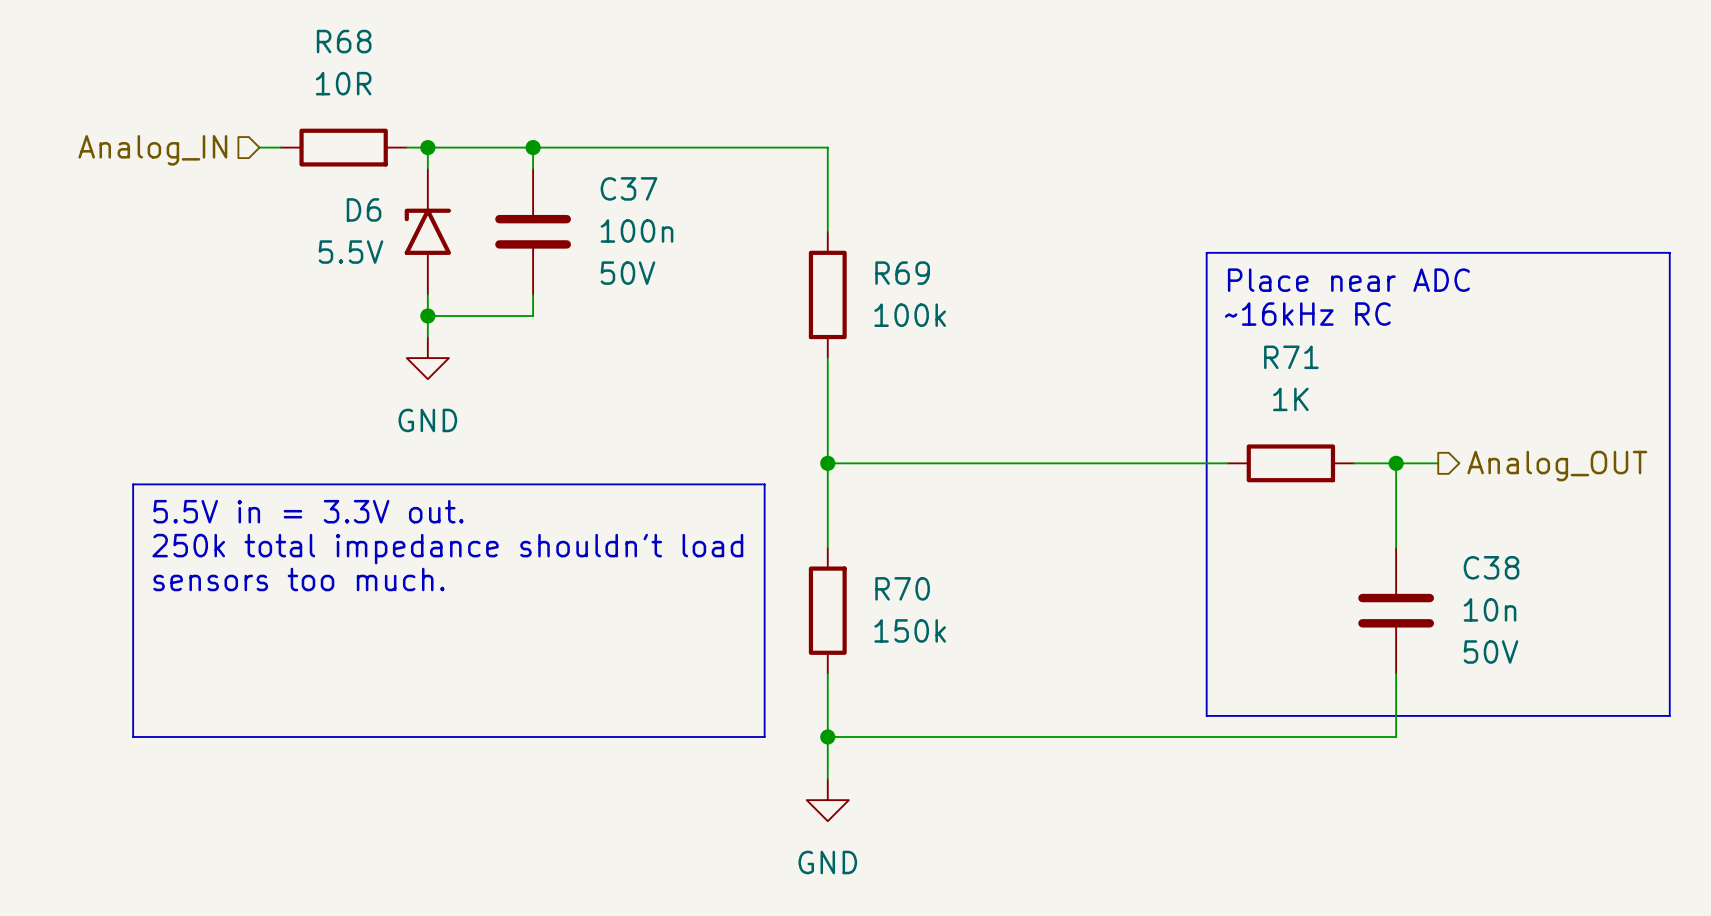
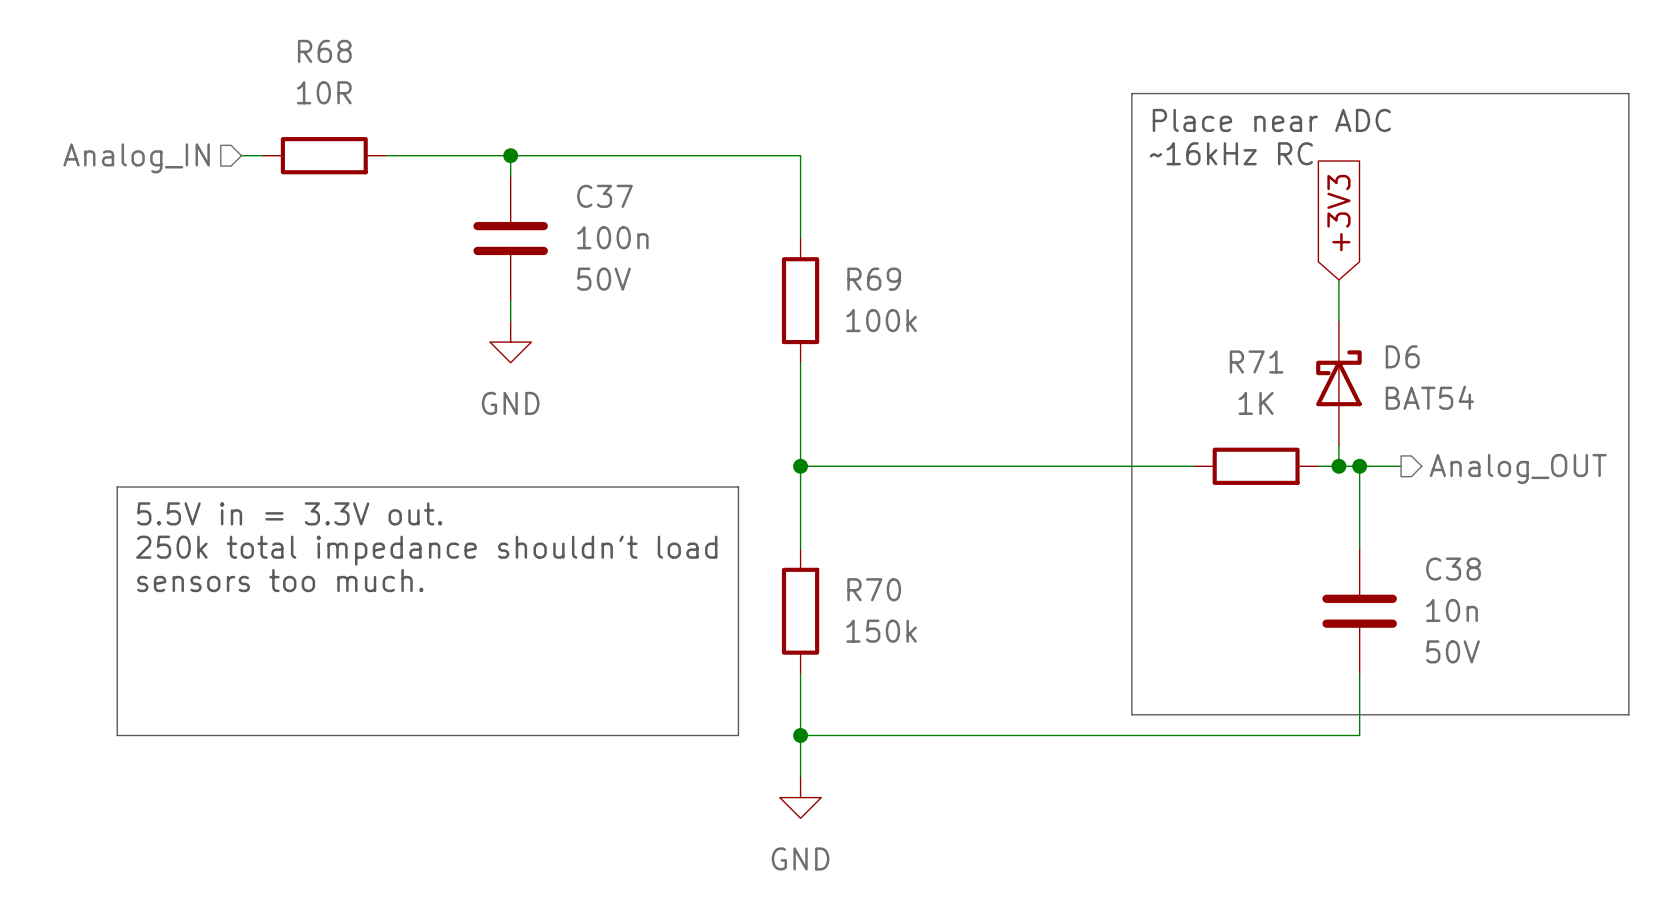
wire: (427, 147) (427, 168) -> none
junction: (427, 147) -> none
D6 symbol: [404, 168, 452, 295] -> [1316, 321, 1362, 446]
global label: none -> +3V3 (1338, 213)
D6 name position: D6 (364, 209) -> D6 (1402, 356)
D6 value: 5.5V (351, 252) -> BAT54 (1429, 397)
line: (1669, 252) (1206, 252) (1206, 715) -> (1628, 259) (1628, 93) (1131, 93) (1131, 714) (1173, 714)
wire: none -> (1338, 279) (1338, 321)
text position: Place near ADC (1348, 280) -> Place near ADC (1271, 120)
wire: (427, 294) (427, 337) -> none
text position: ~16kHz RC (1307, 314) -> ~16kHz RC (1231, 153)
wire: (427, 315) (533, 315) -> none
junction: (427, 315) -> none
power symbol position: GND (427, 358) -> GND (510, 342)
wire: none -> (1338, 445) (1338, 466)
junction: none -> (1338, 466)

